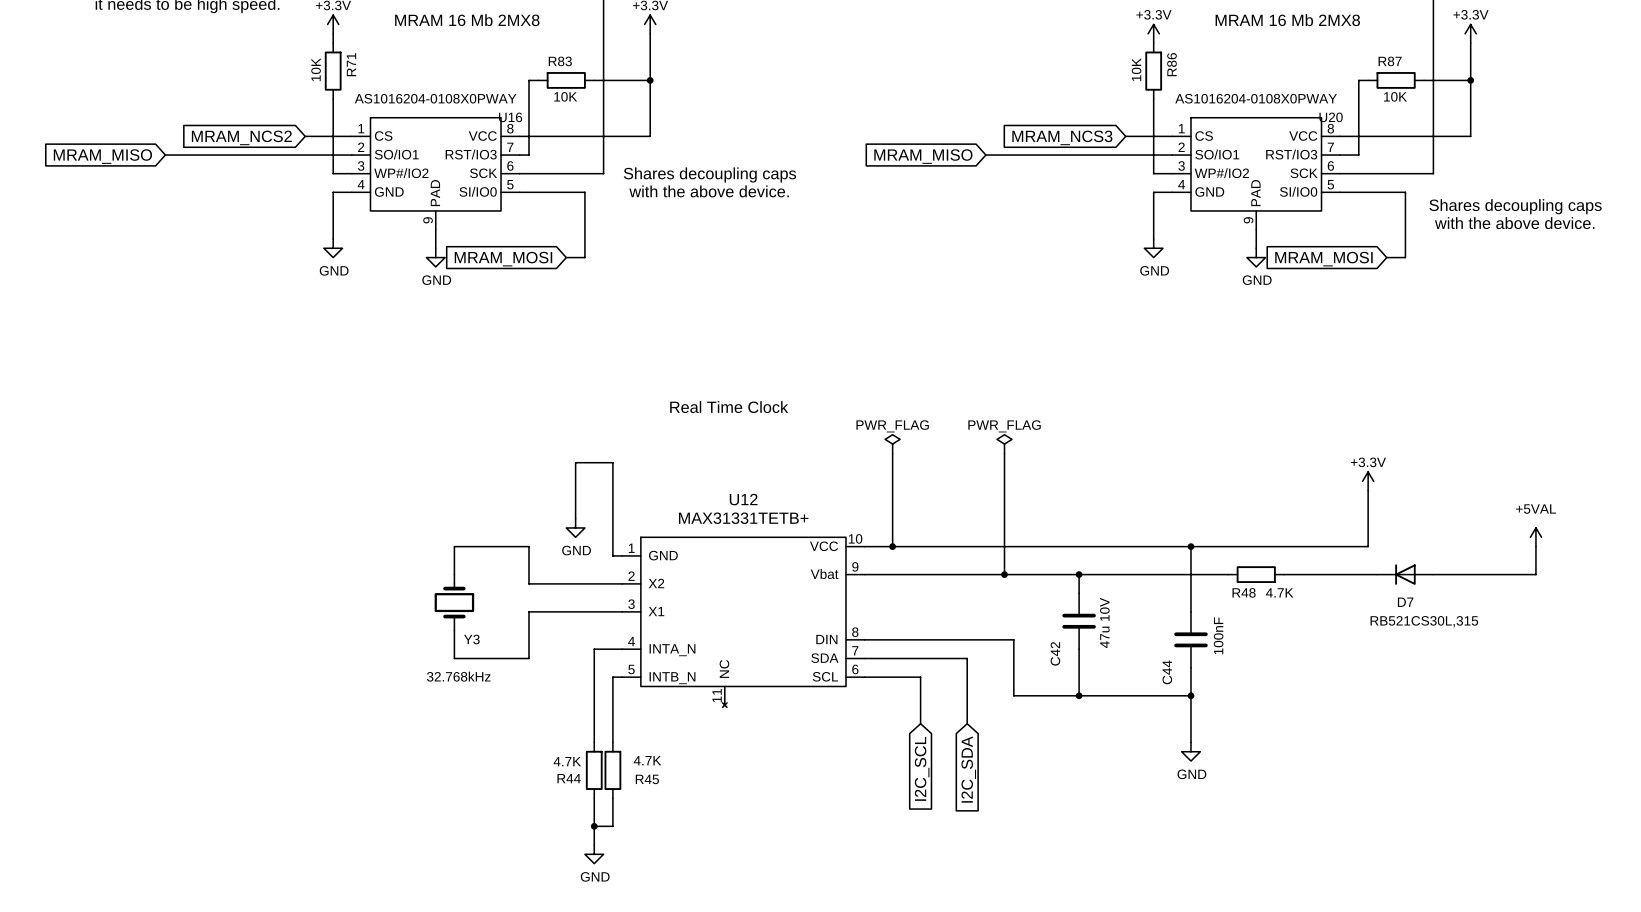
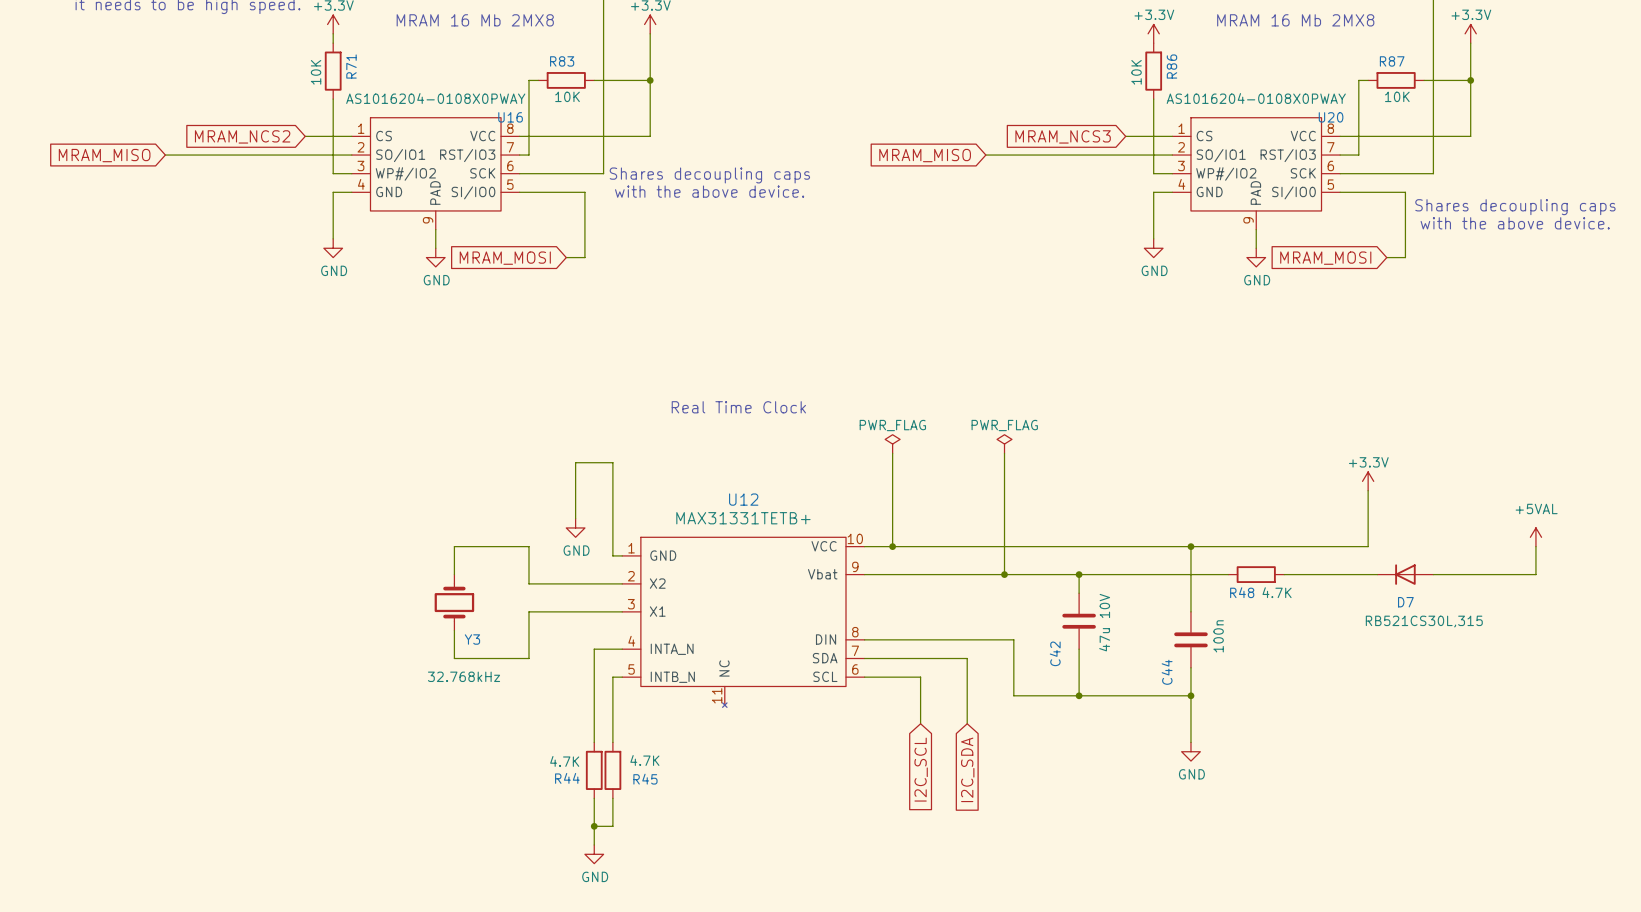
C44 value: 100nF (1218, 635) -> 100n (1218, 636)

